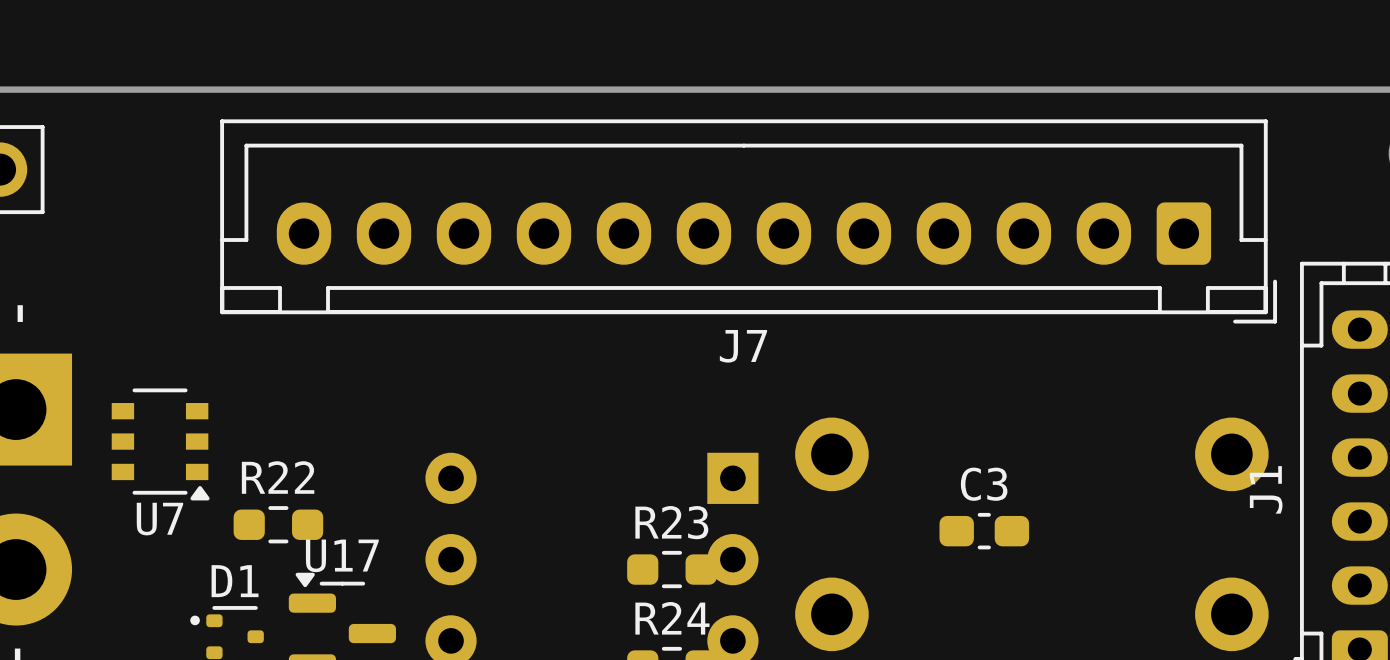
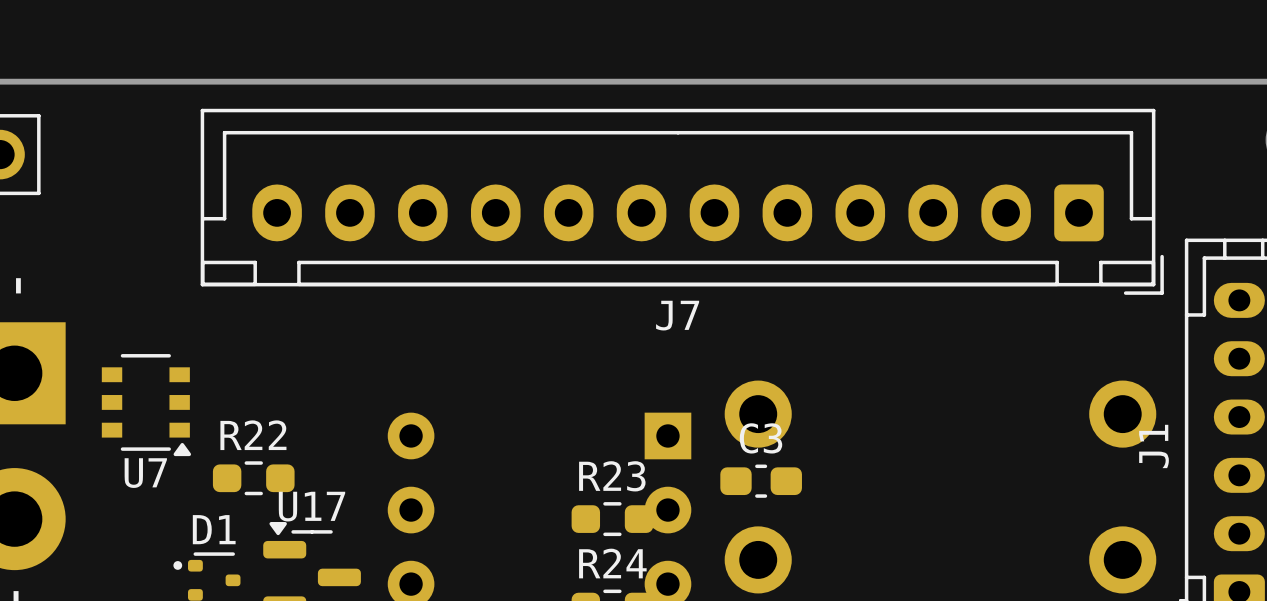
C3 position: (984, 531) -> (761, 481)

